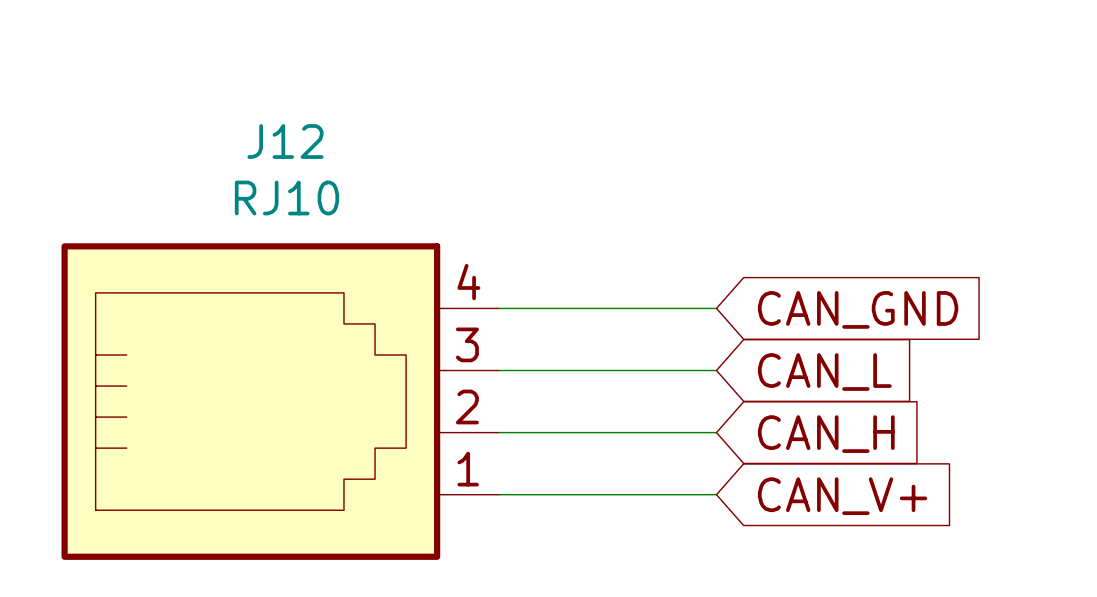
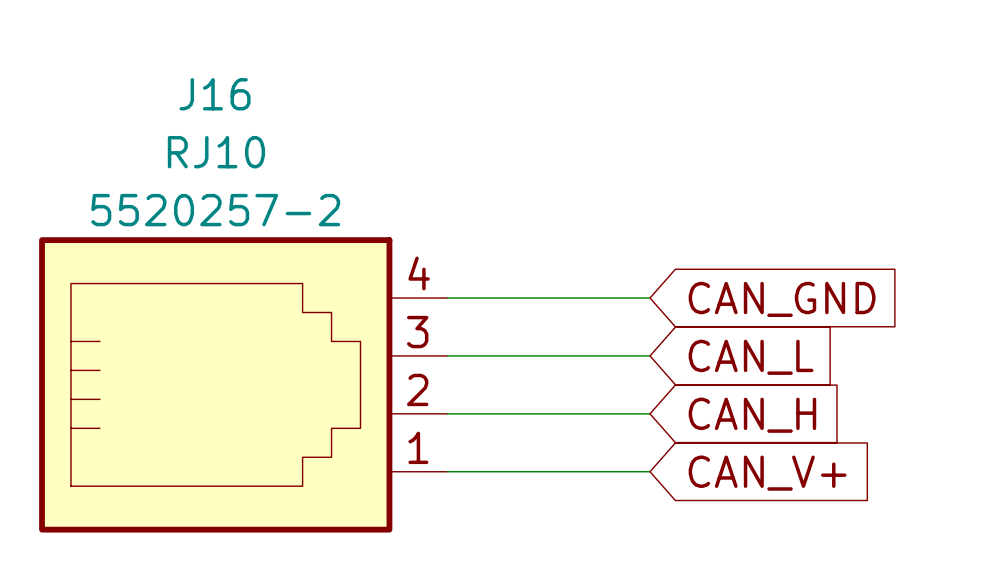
J12 name: J12 (285, 141) -> J16 (215, 94)
J12 value position: RJ10 (286, 198) -> RJ10 (216, 152)
J12 text: none -> 5520257-2 (215, 210)

